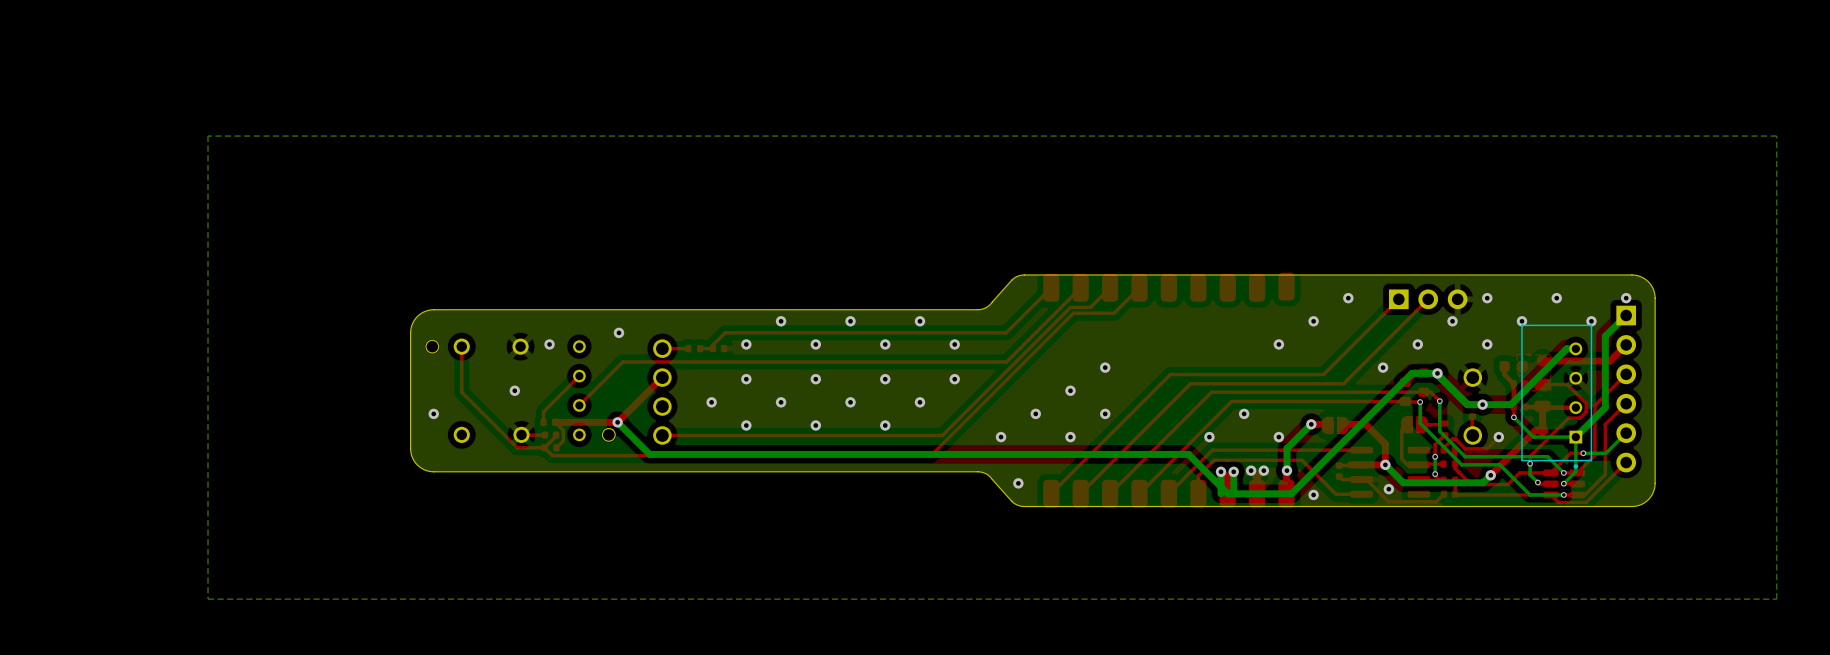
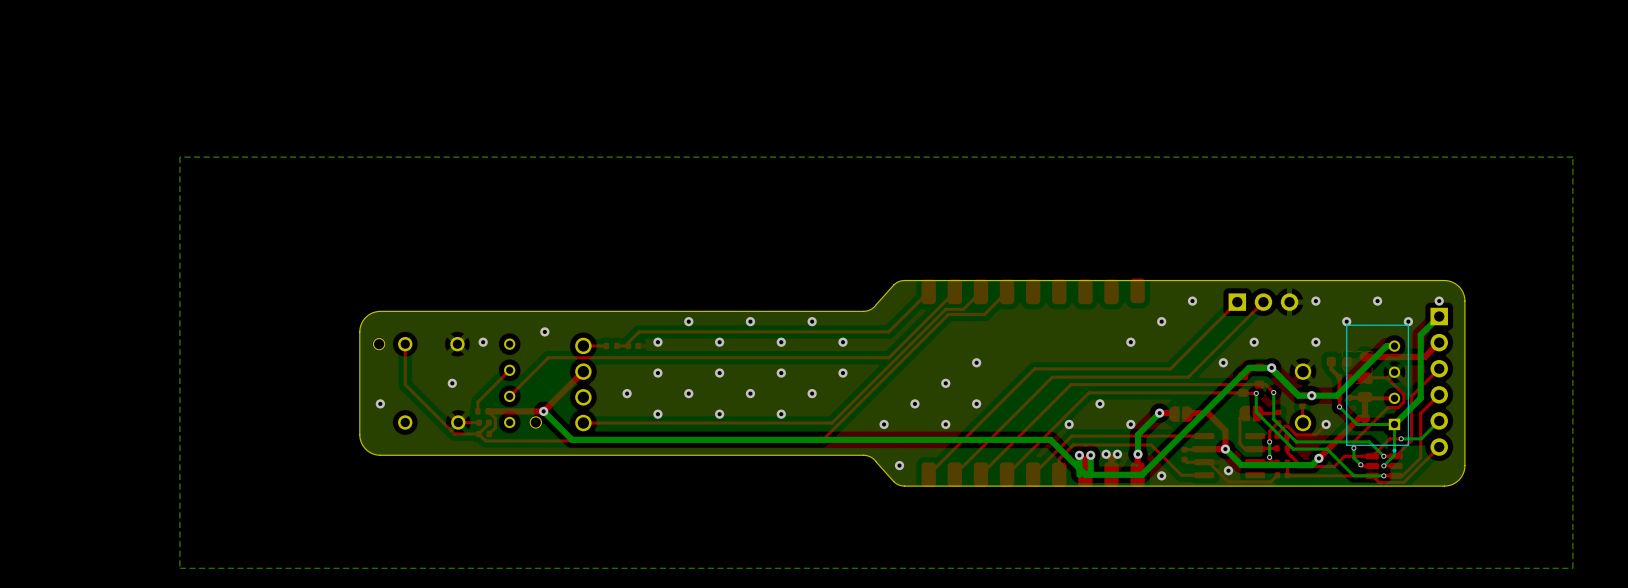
via: (1452, 321) -> none

